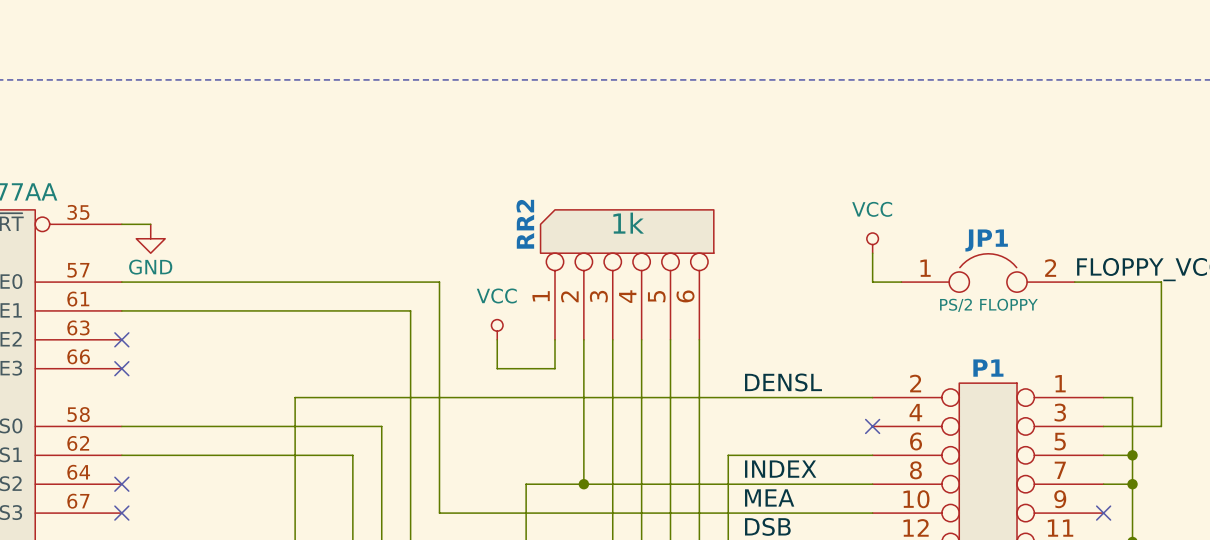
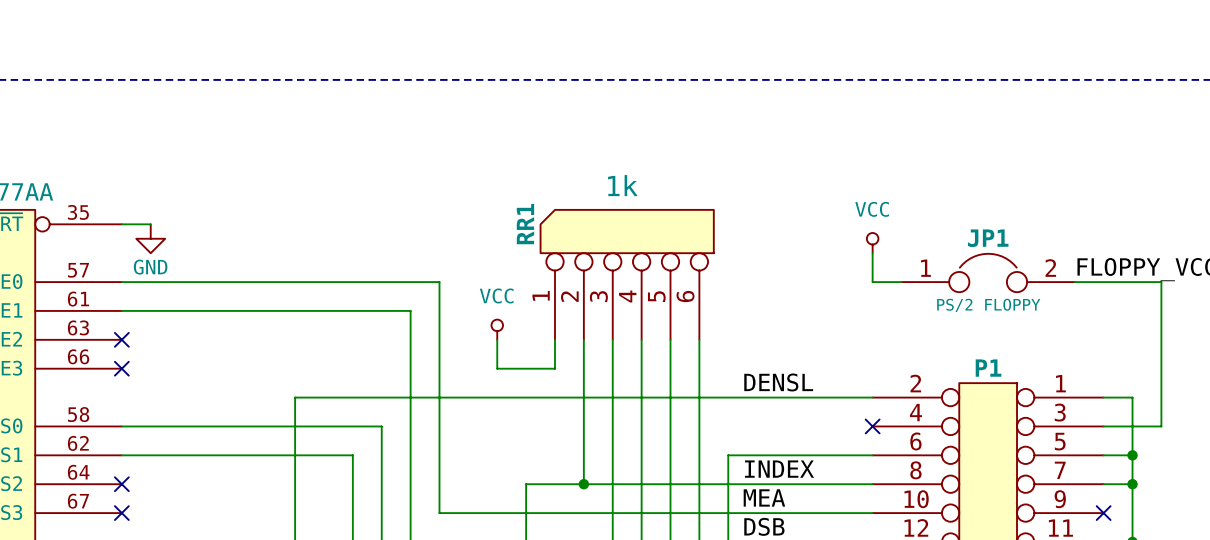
RR2 value position: 1k (628, 223) -> 1k (622, 185)
RR2 name: RR2 (525, 224) -> RR1 (525, 224)

